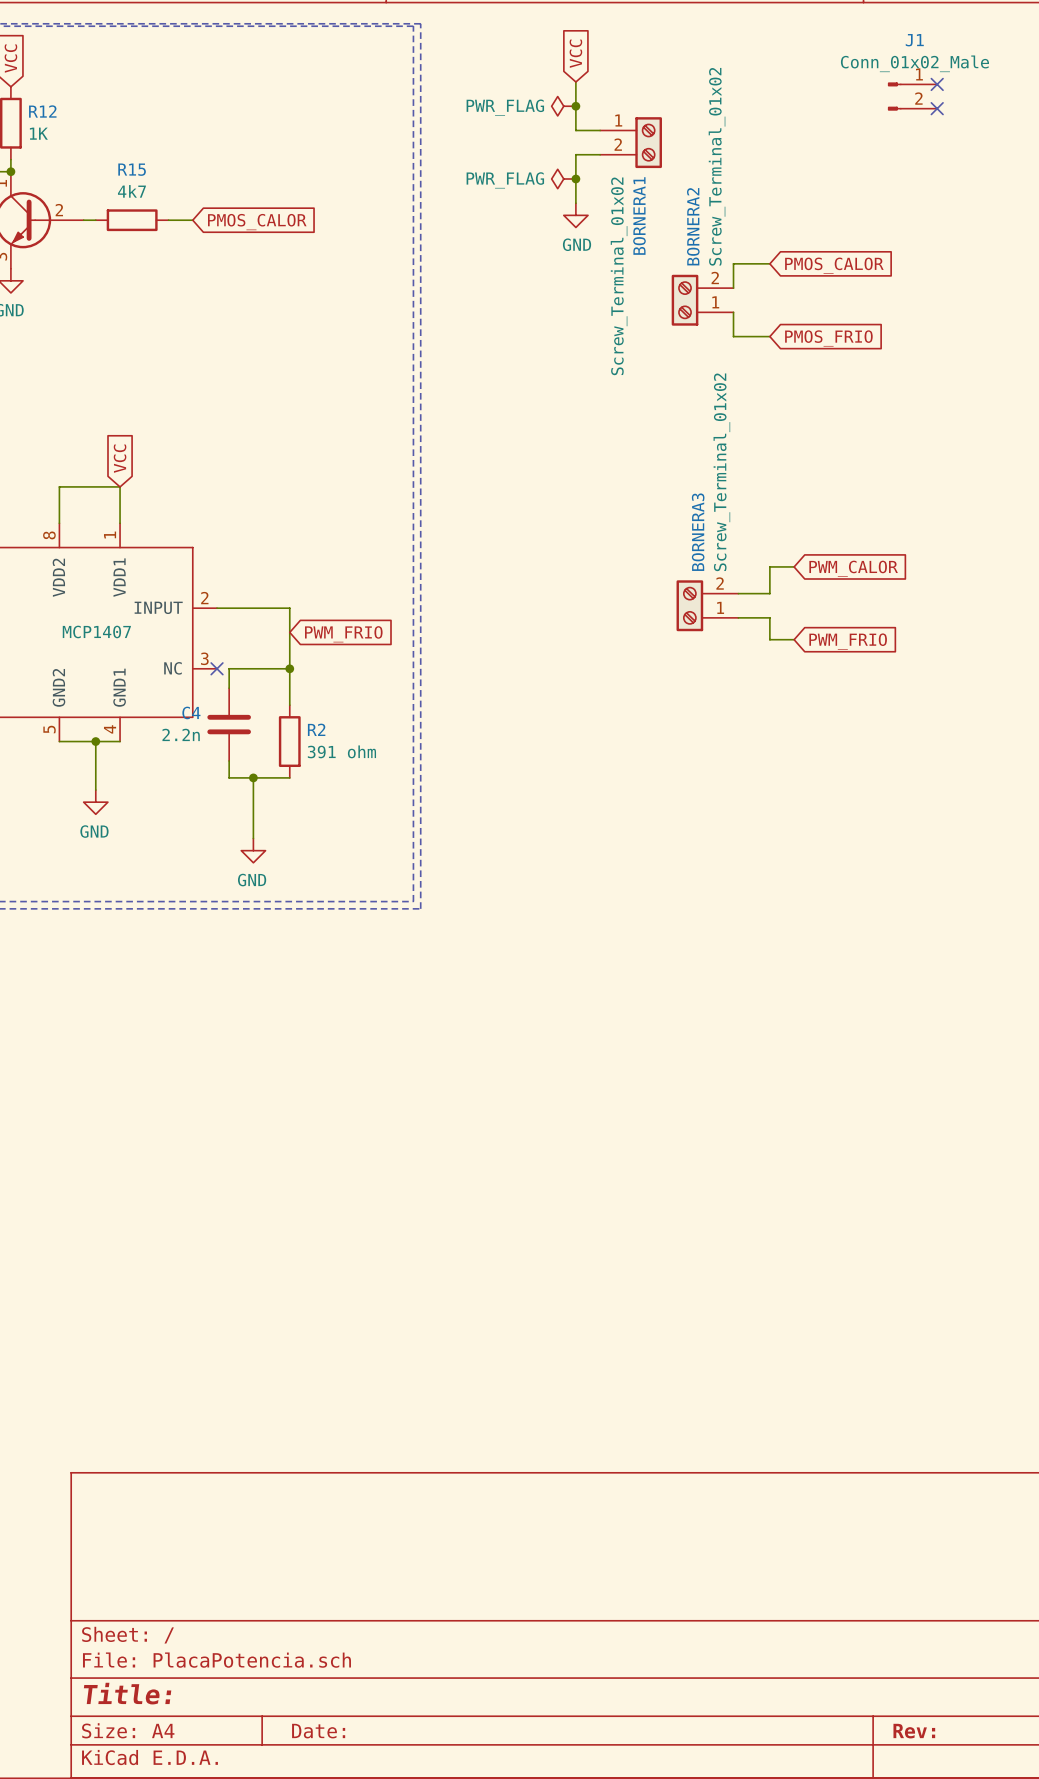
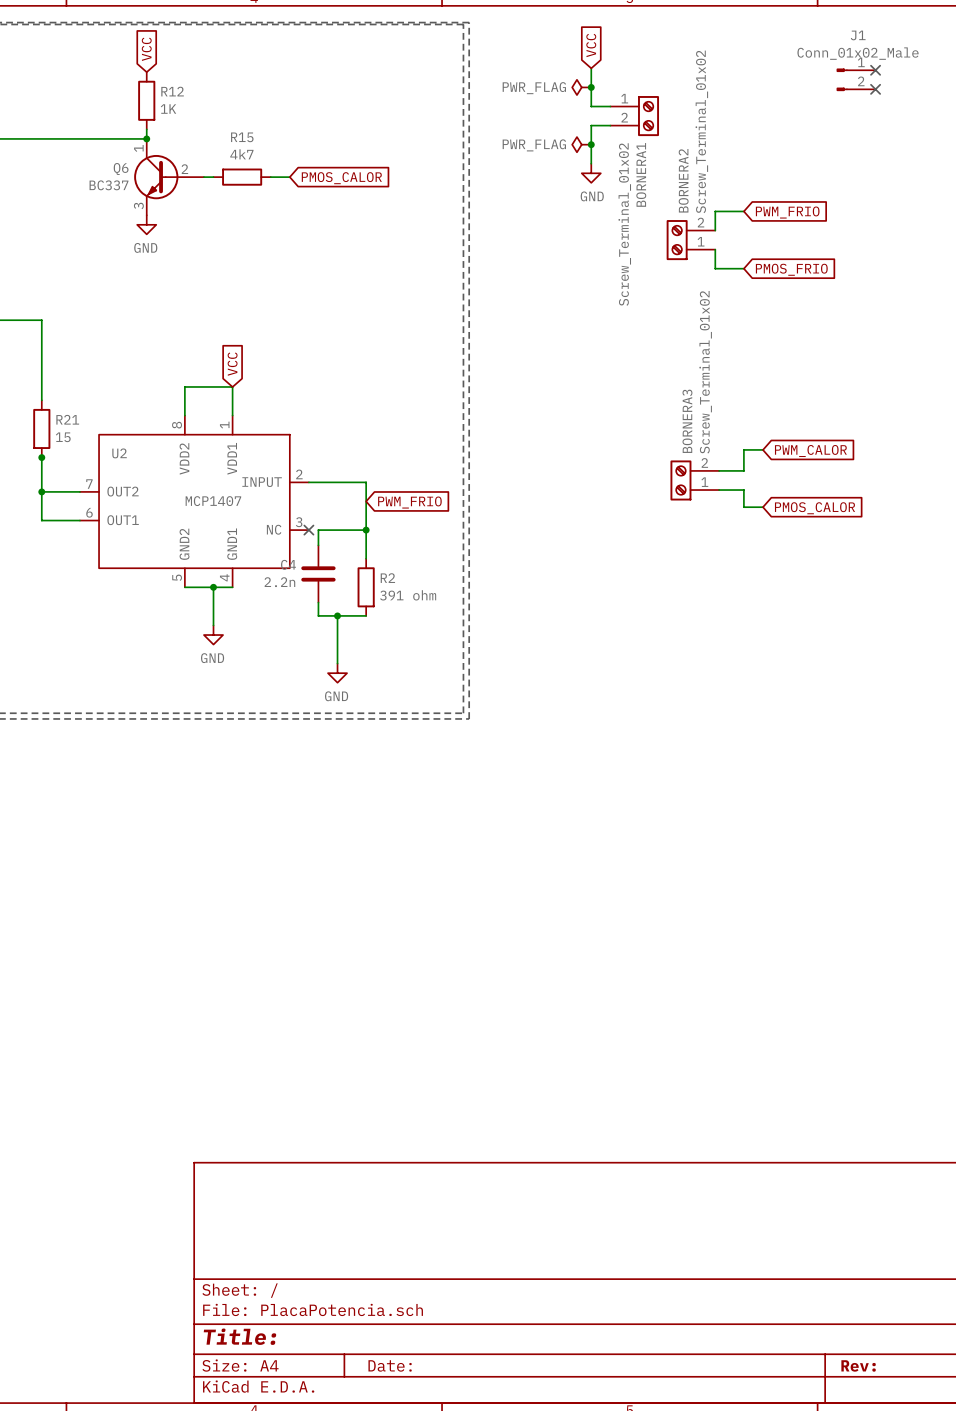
global label: PMOS_CALOR (834, 265) -> PWM_FRIO (787, 212)
global label: PWM_FRIO (848, 641) -> PMOS_CALOR (815, 508)

